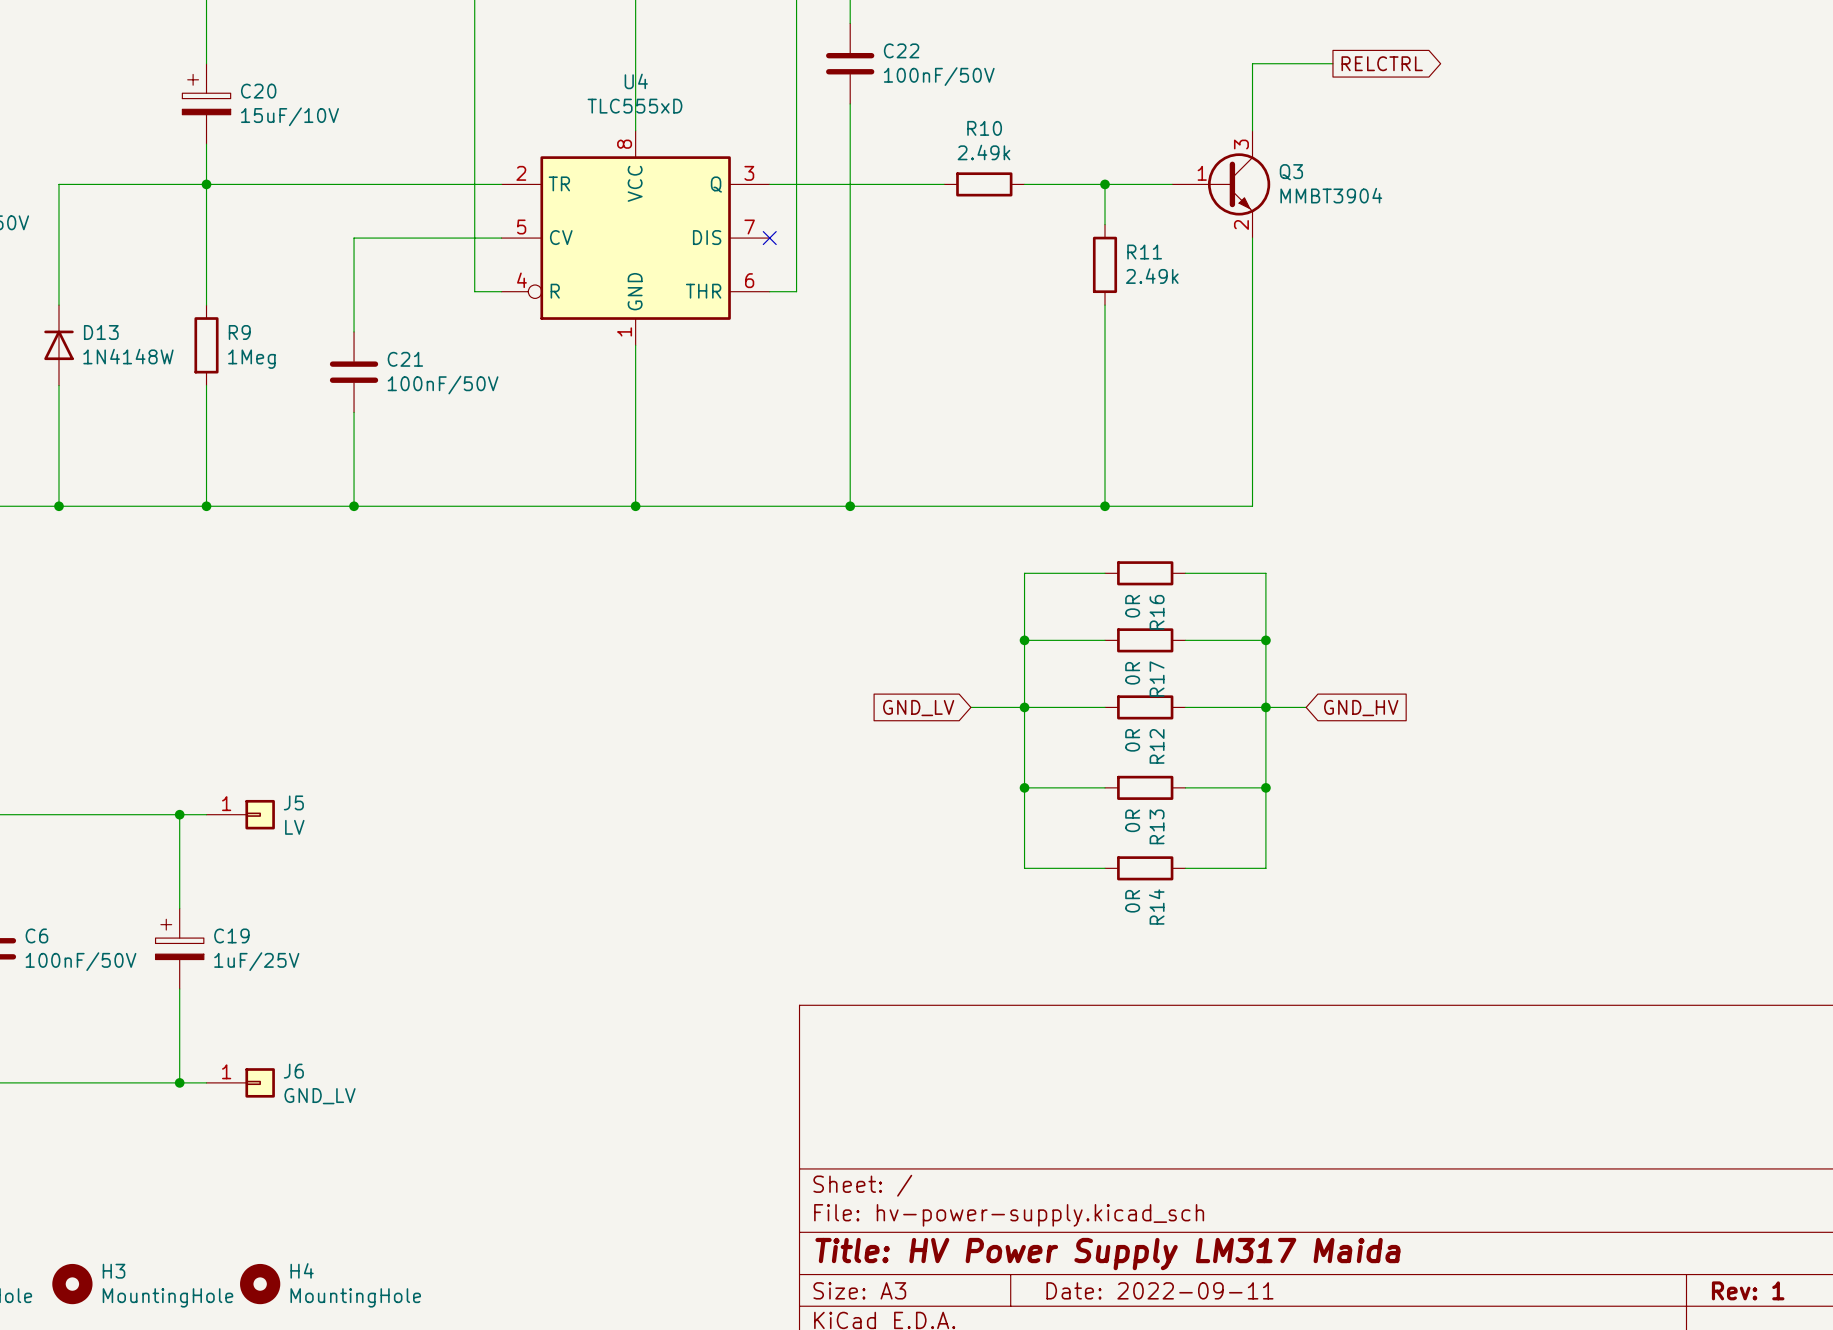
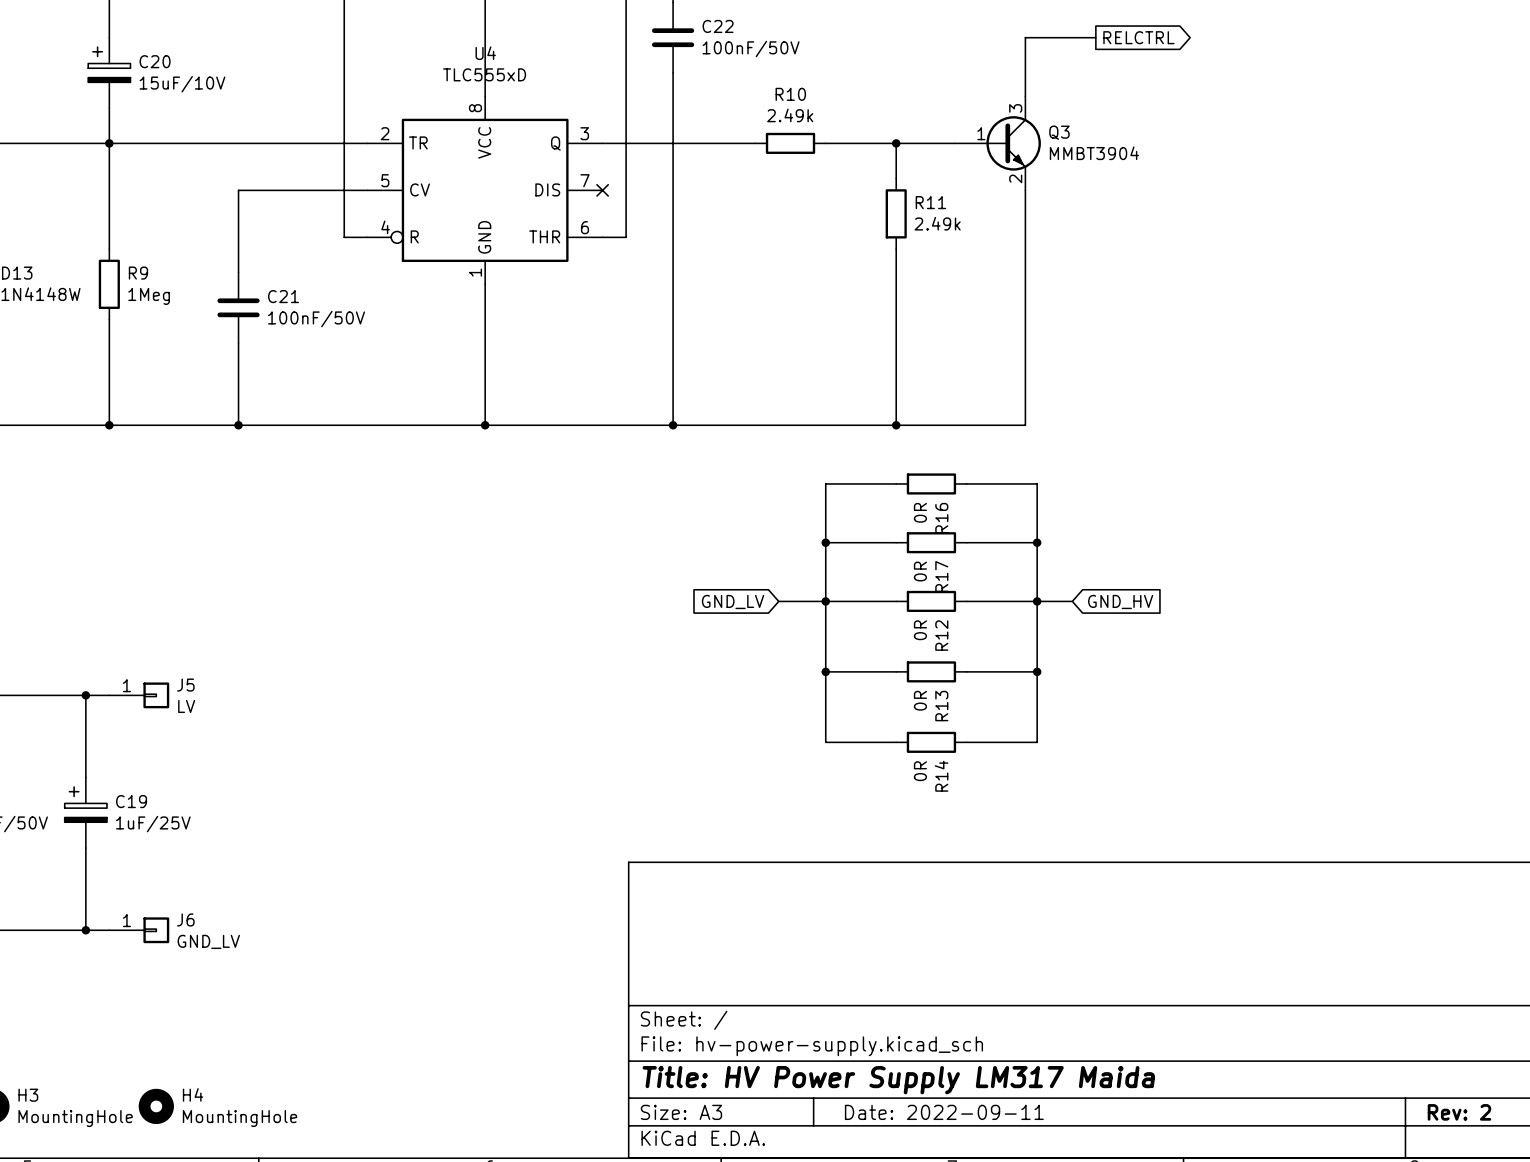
title block: Rev: 1 (1748, 1290) -> Rev: 2 (1459, 1112)

